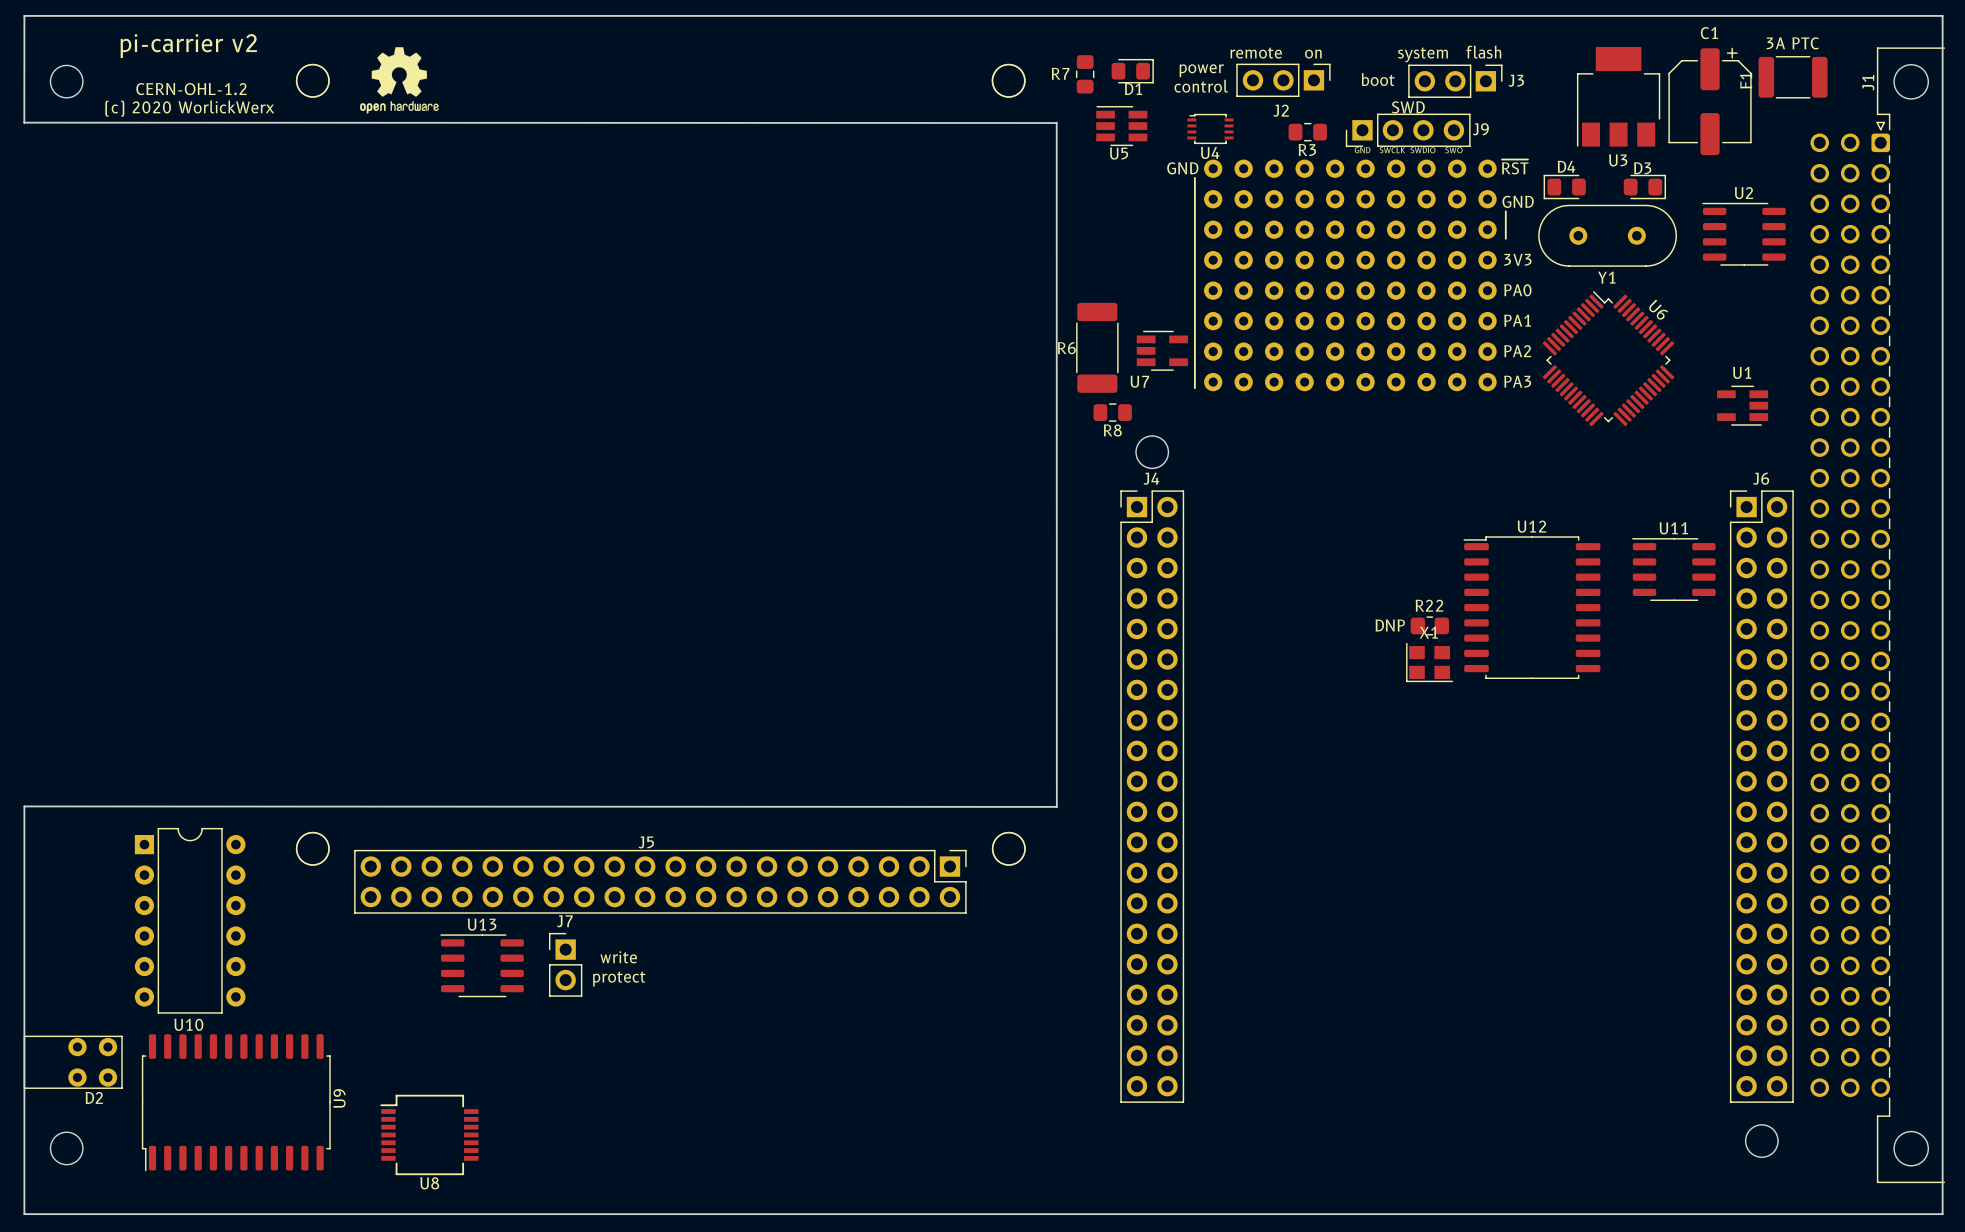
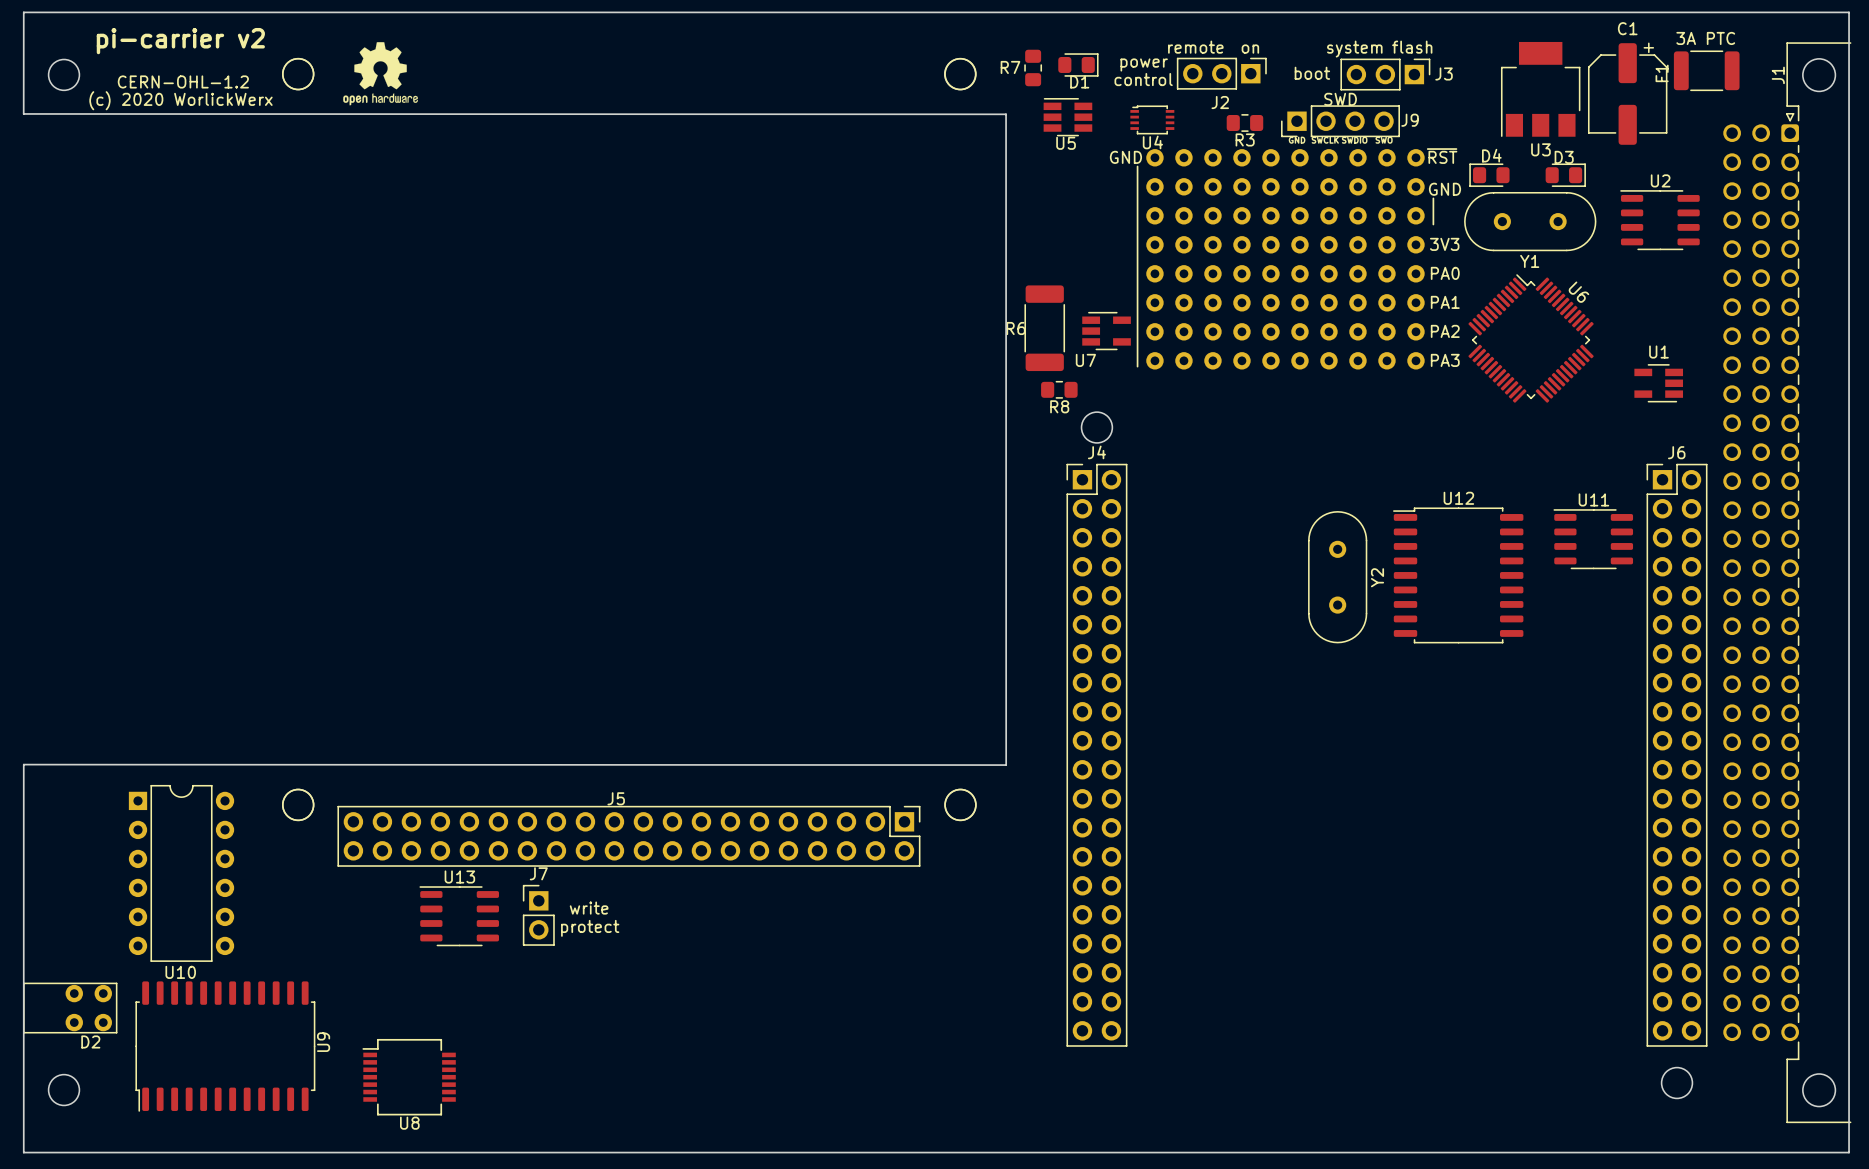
Y2: none -> (1337, 577)
text: DNP (1390, 625) -> none
R22: (1429, 625) -> none
X1: (1429, 662) -> none

